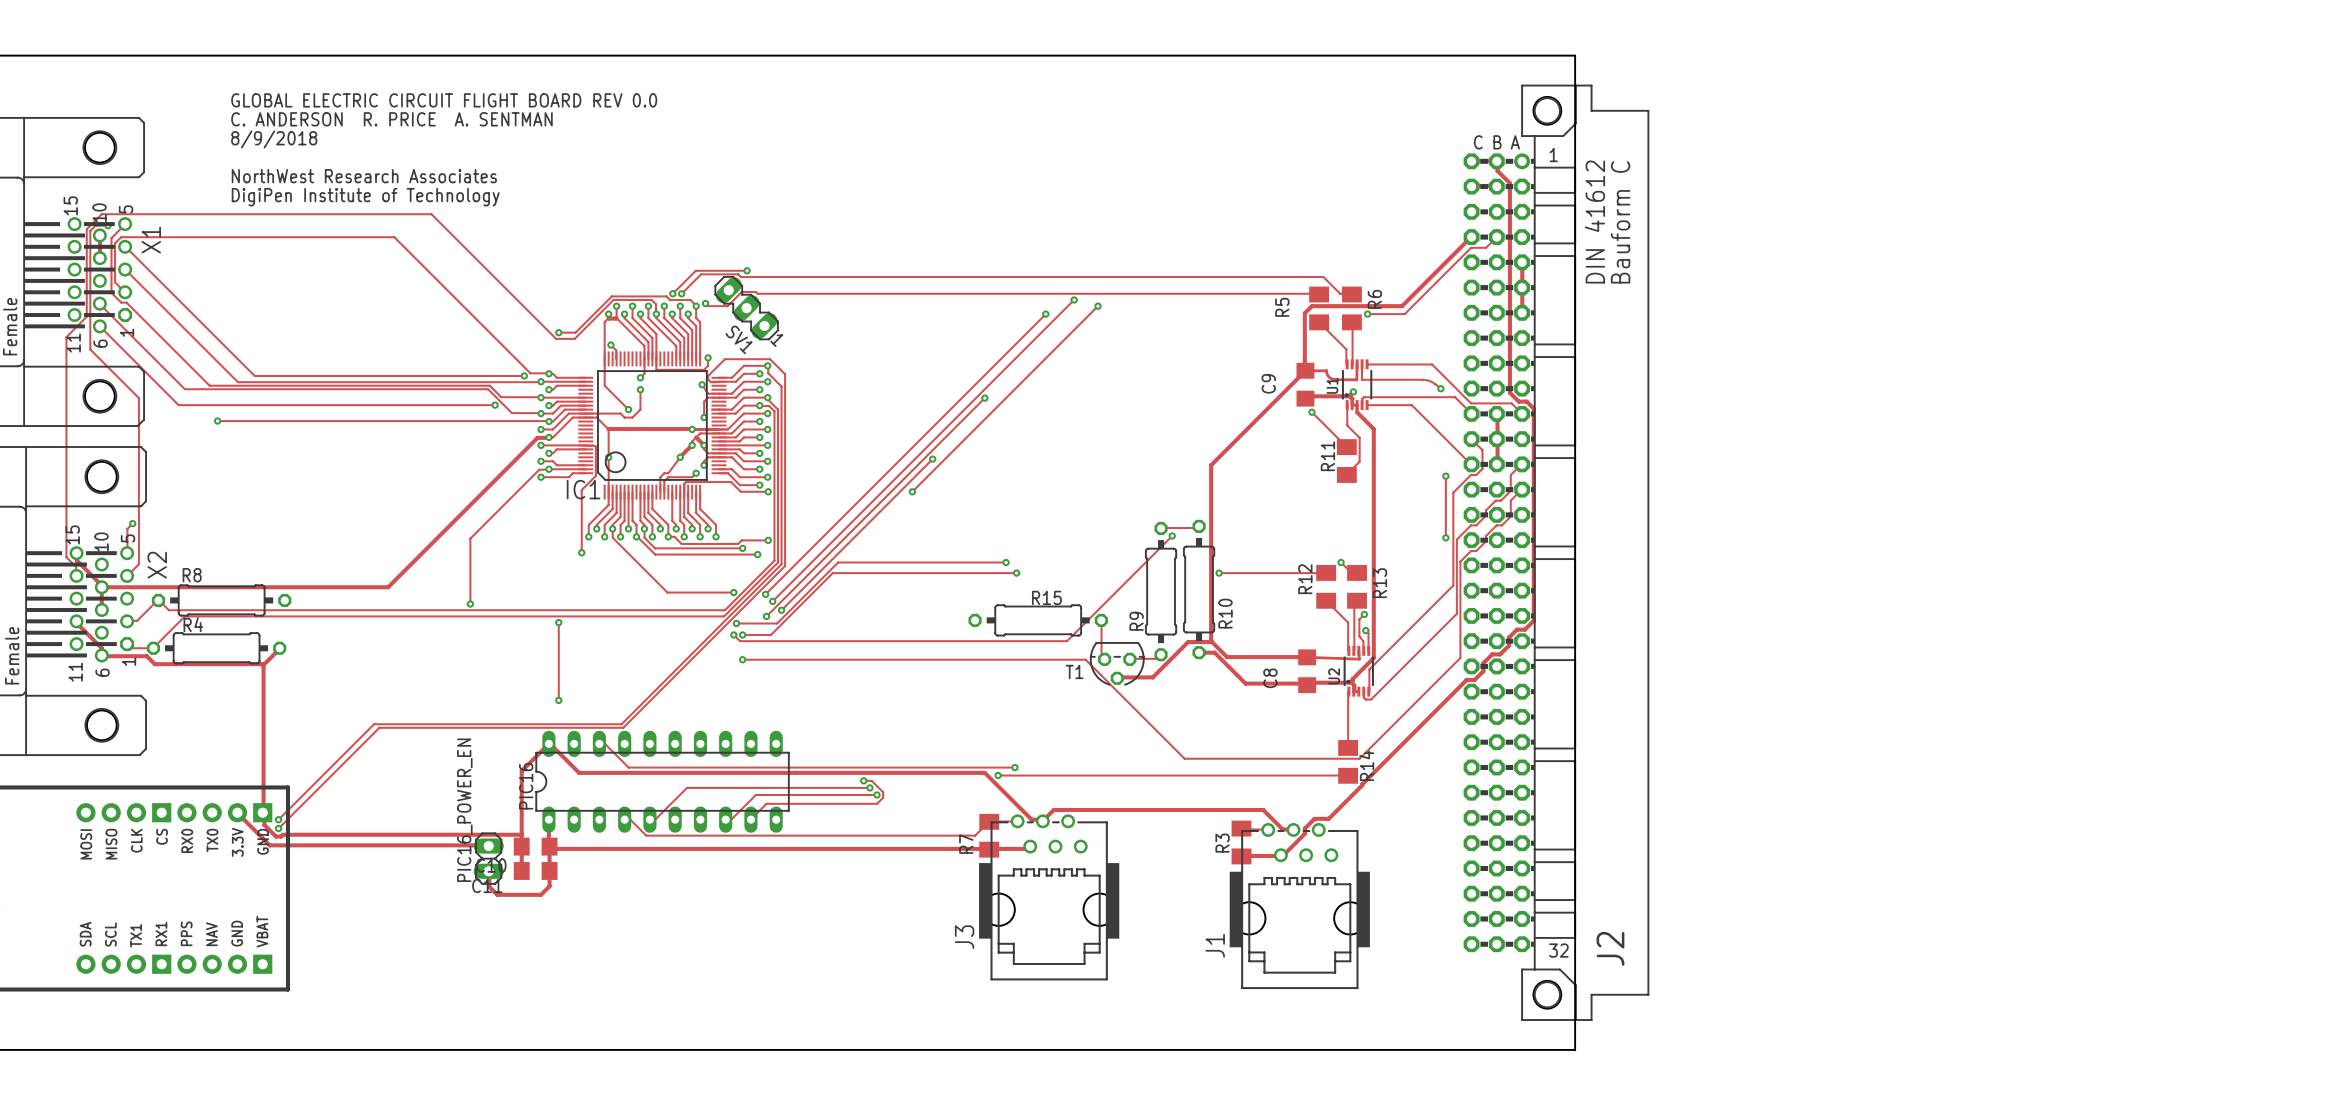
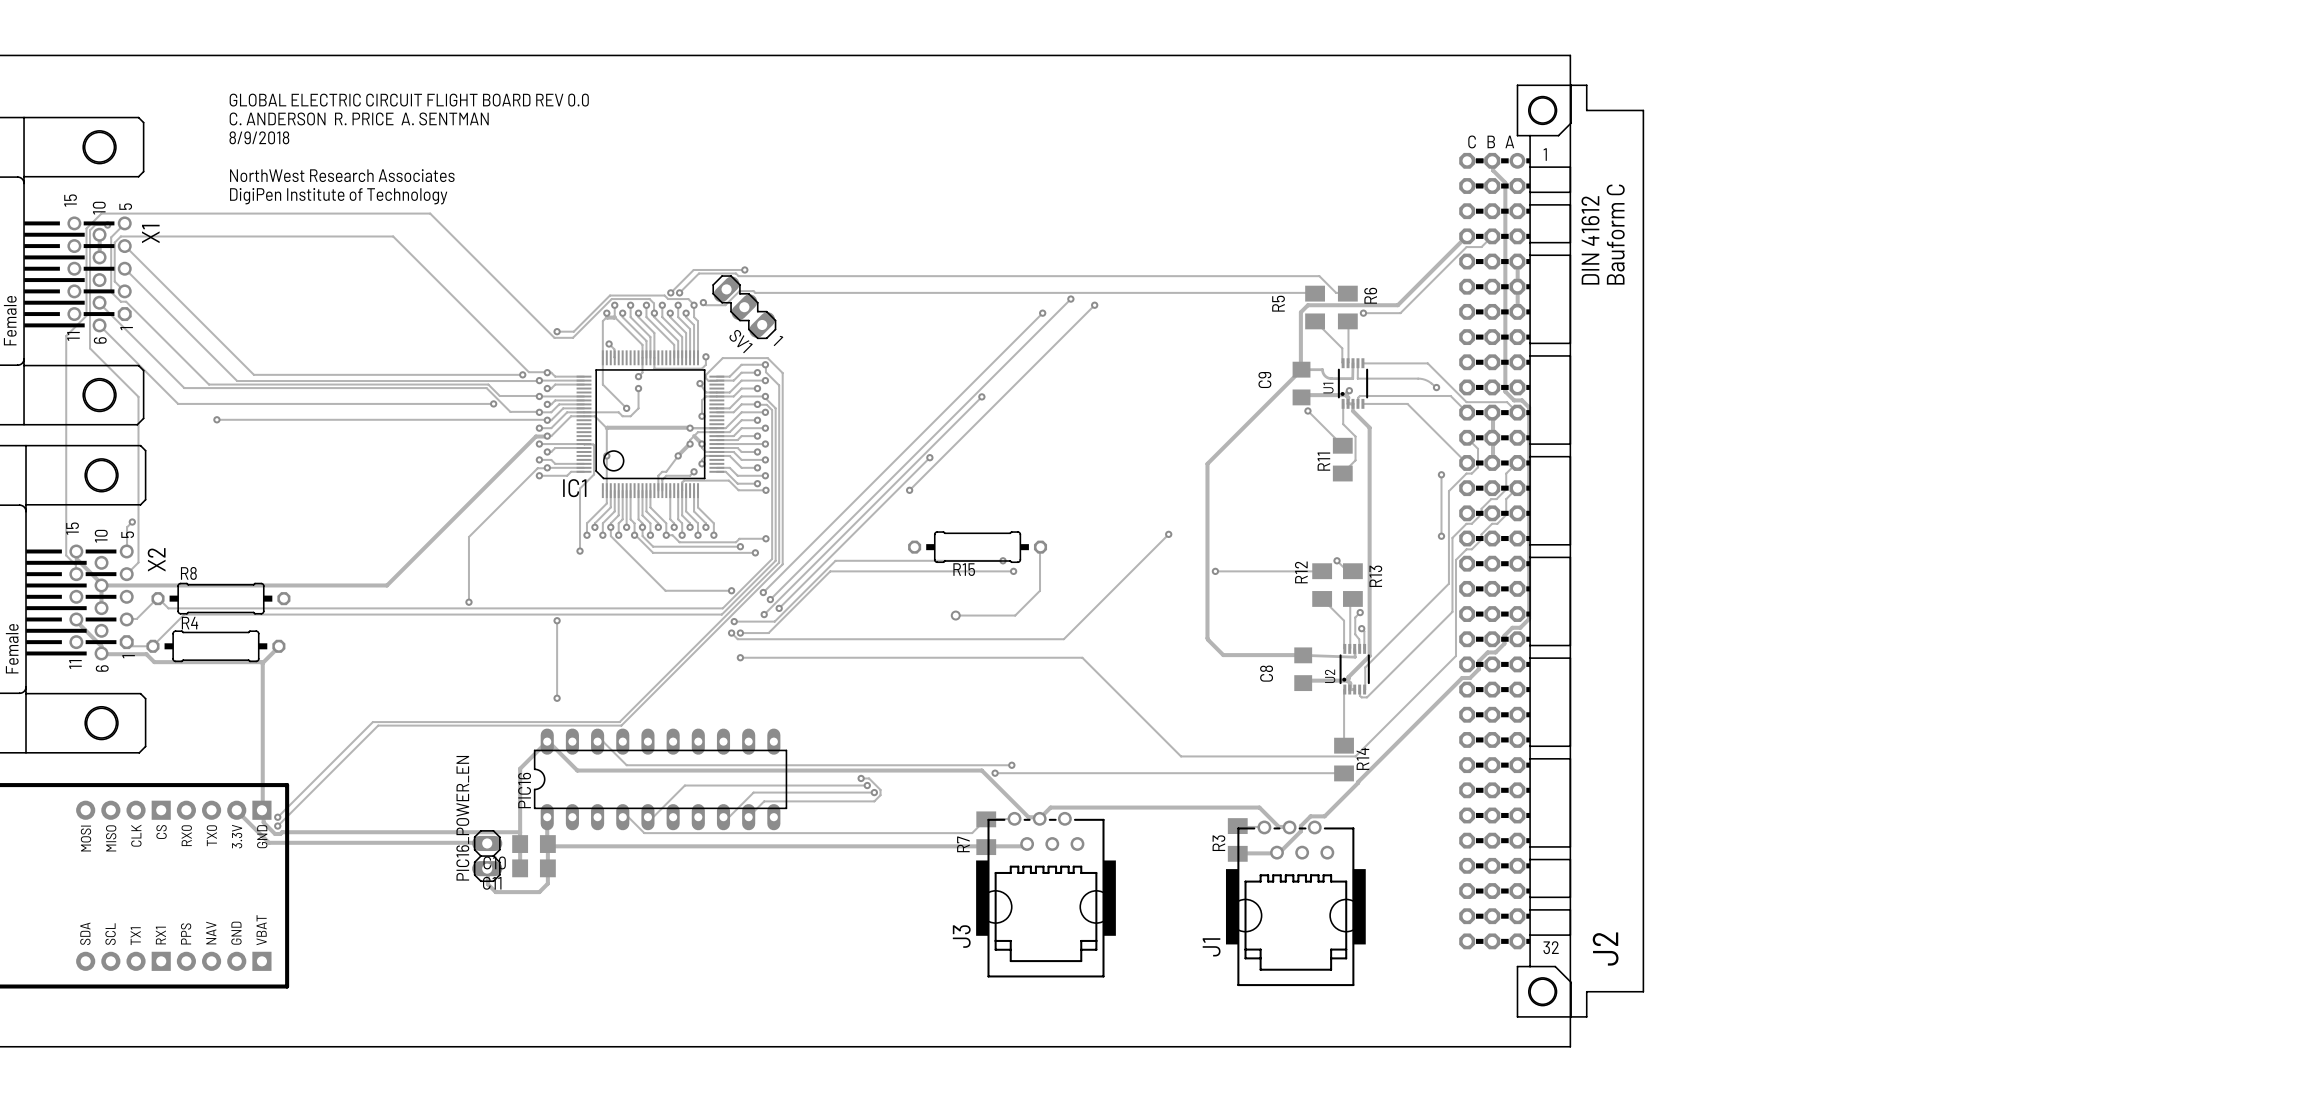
track: (1199, 526) (1197, 528) (1161, 528) -> none
track: none -> (1040, 547) (1040, 590) (1015, 615) (955, 615)
R10: (1199, 589) -> none
R9: (1161, 591) -> none
R15 name position: R15 (1046, 597) -> R15 (964, 569)
via: none -> (955, 615)
R15 position: (1038, 620) -> (977, 547)
track: (1101, 620) (1101, 656) (1104, 659) -> none
track: (1212, 642) (1188, 642) (1152, 677) (1117, 678) -> none
track: (1199, 652) (1214, 652) (1245, 683) (1305, 683) -> none
track: (1161, 654) (1157, 658) (1129, 659) -> none
T1: (1117, 663) -> none

